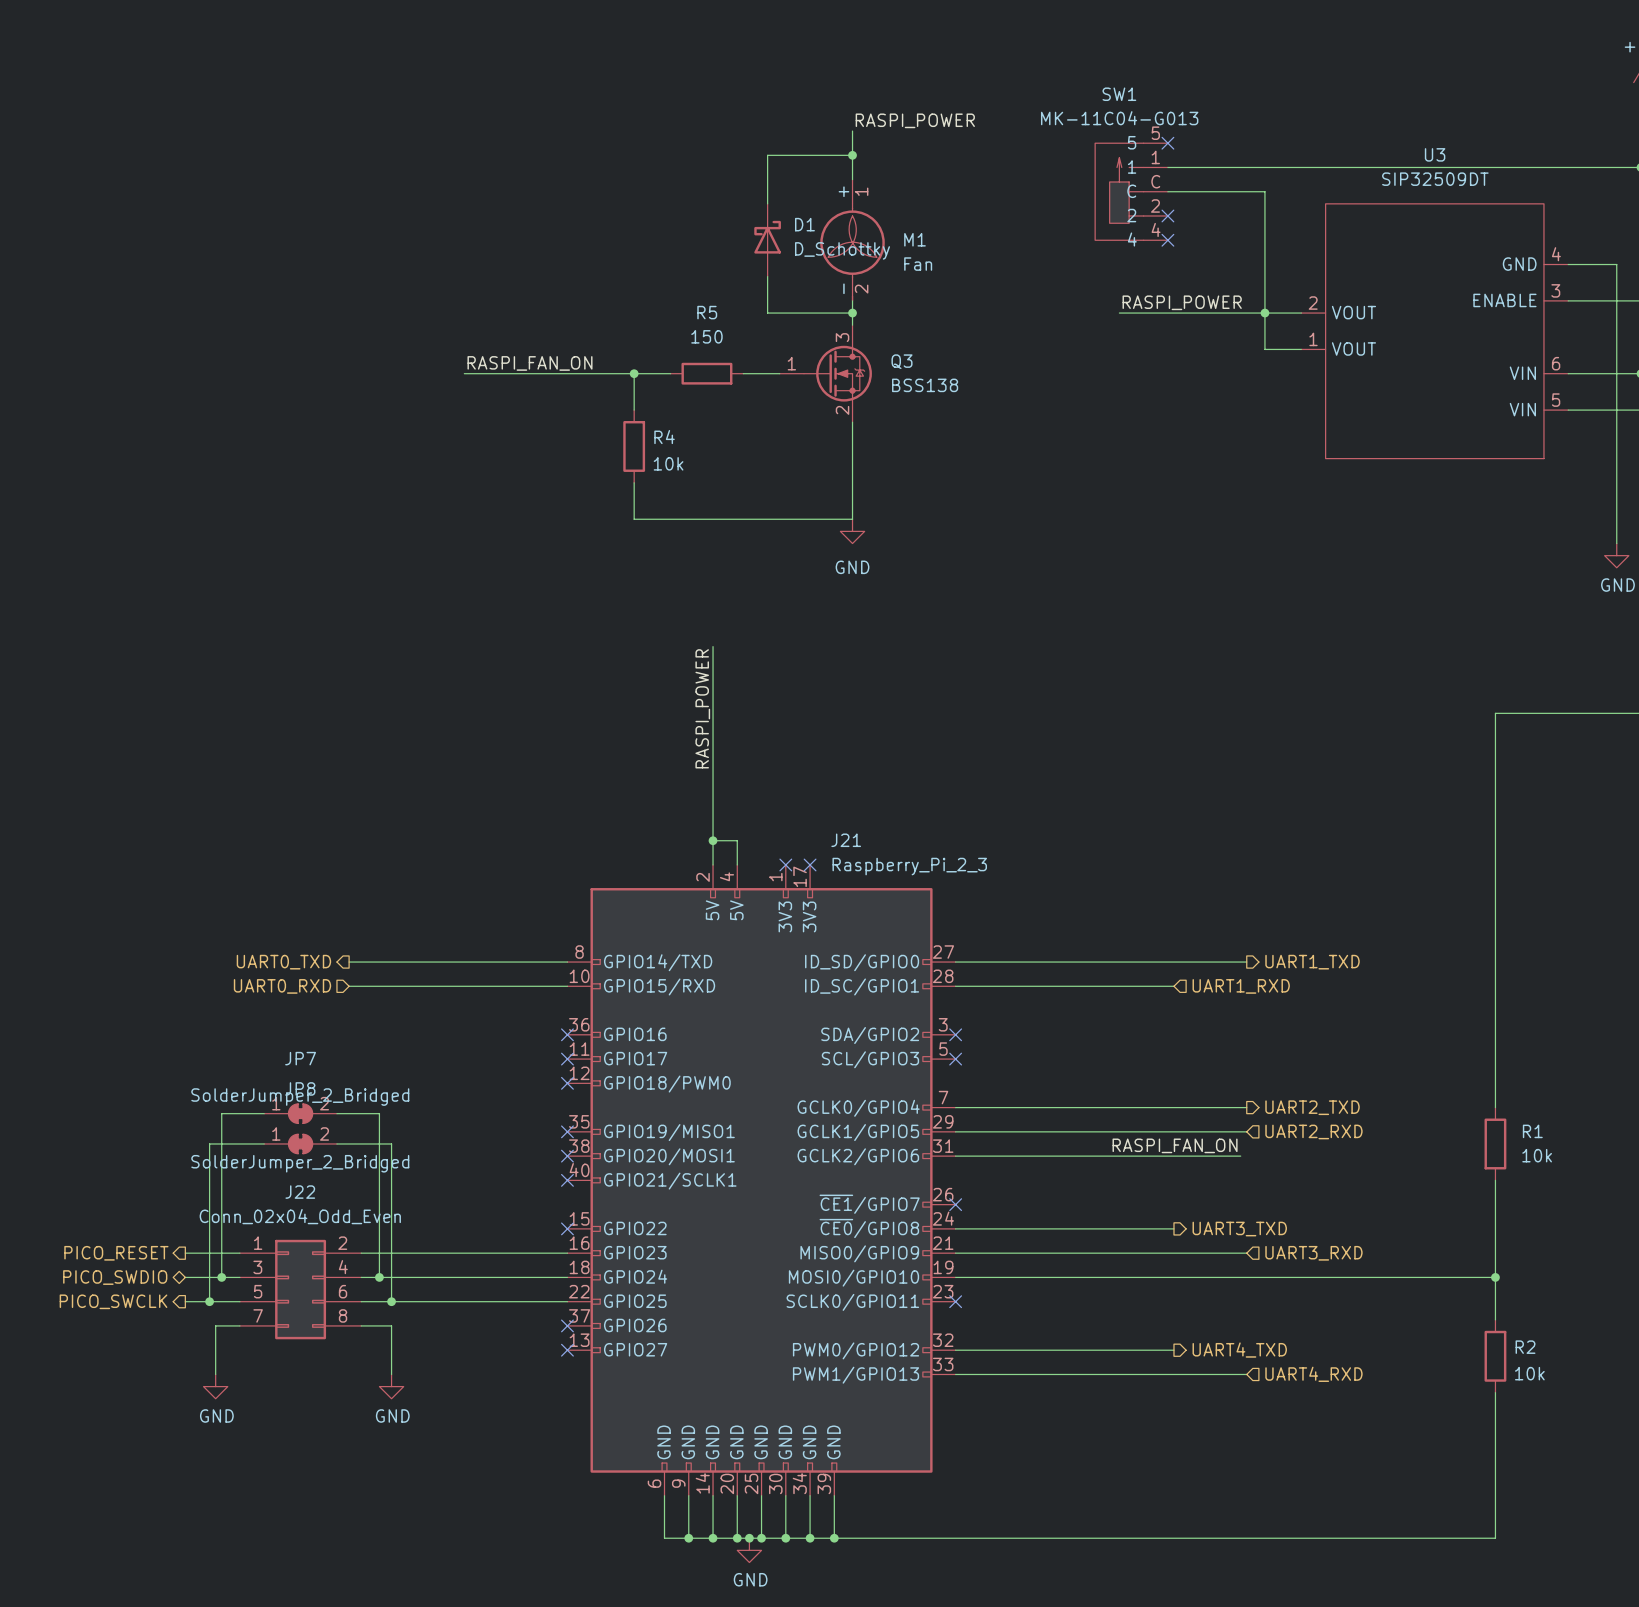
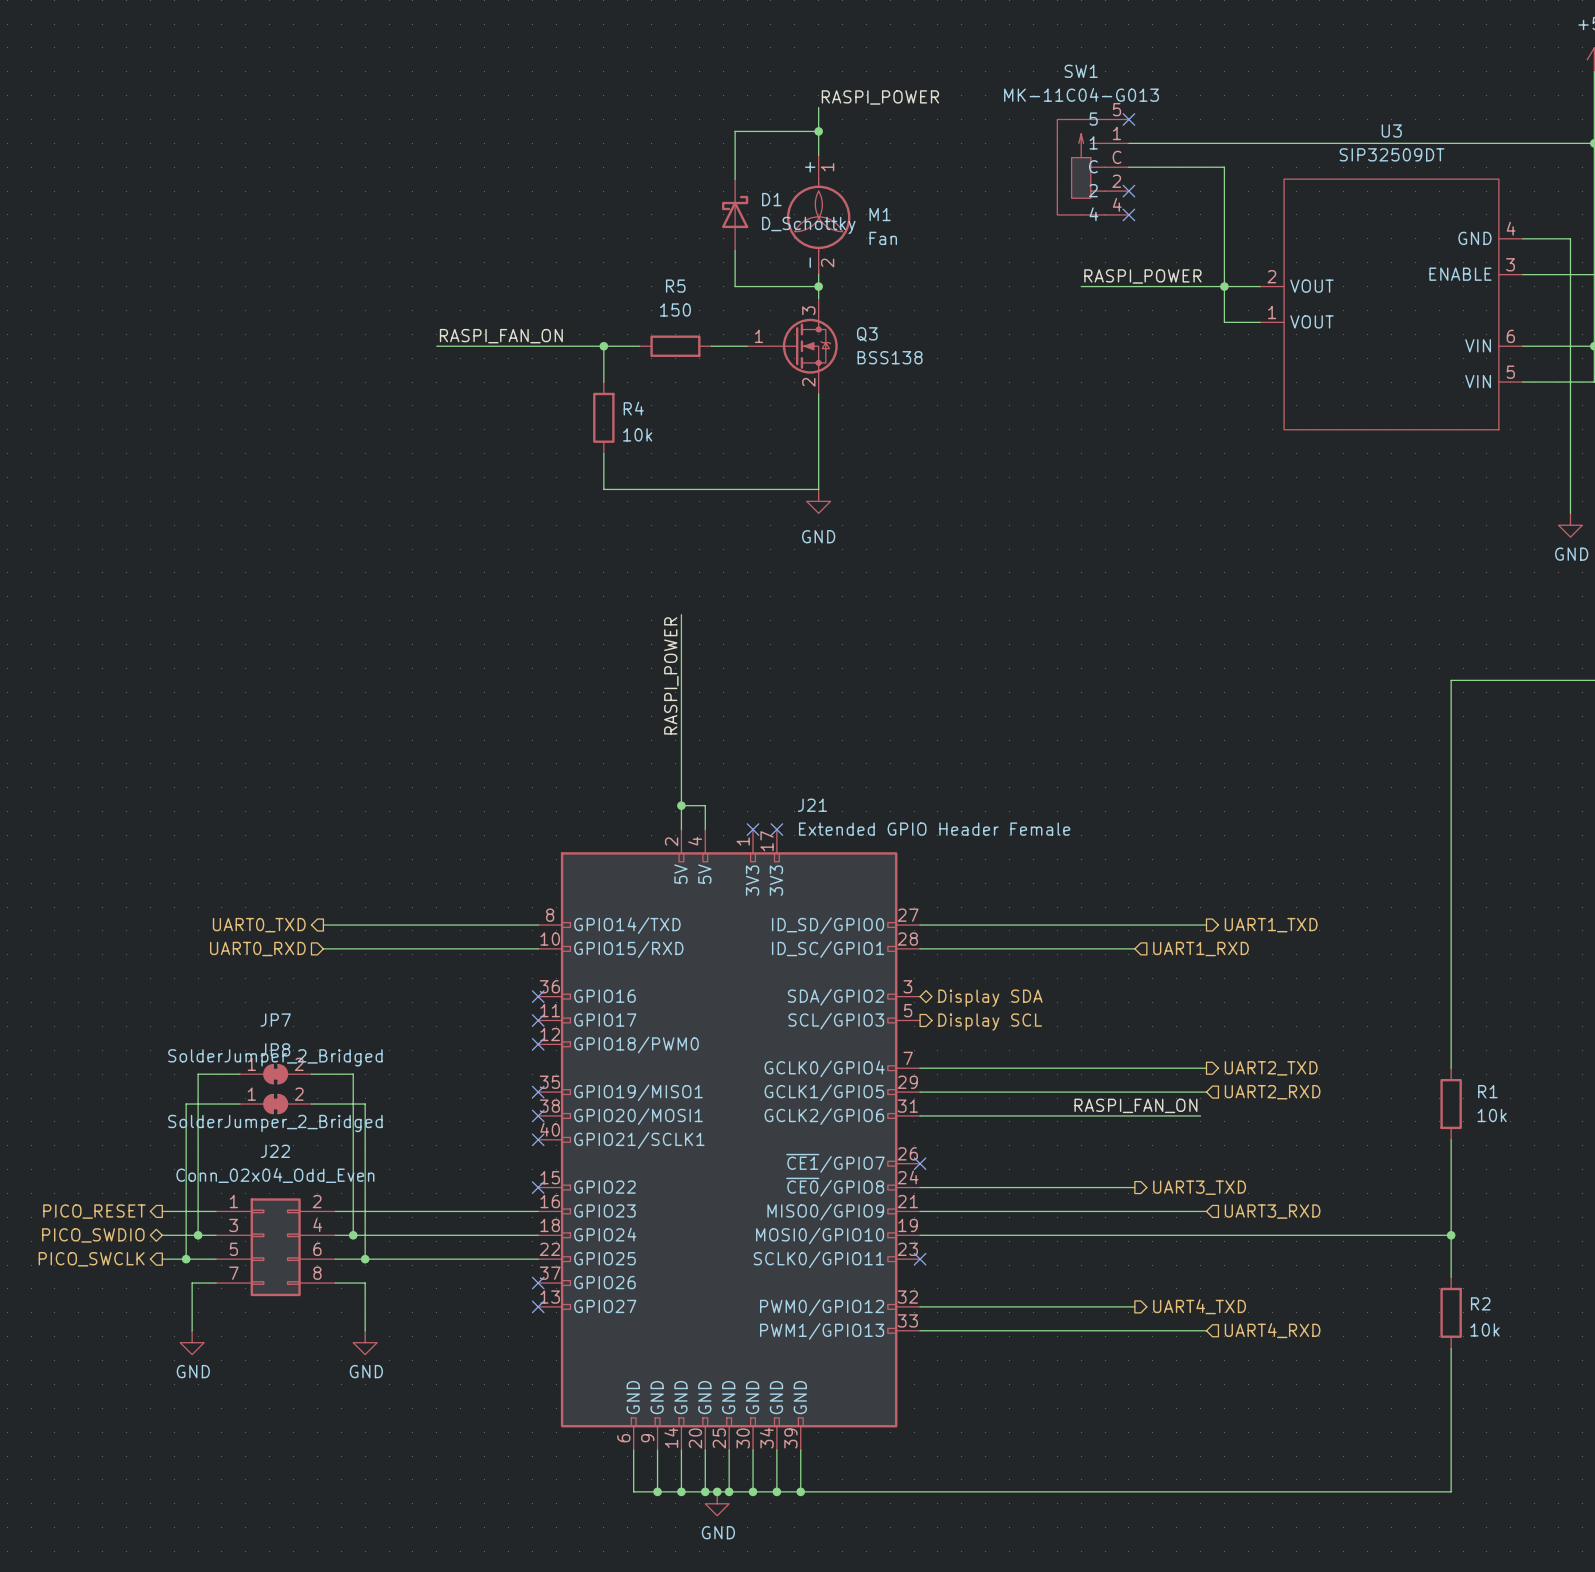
J21 value: Raspberry_Pi_2_3 (909, 866) -> Extended GPIO Header Female (934, 829)
no-connect mark: (955, 1034) -> none
hierarchical label: none -> Display SDA (990, 998)
no-connect mark: (955, 1059) -> none
hierarchical label: none -> Display SCL (990, 1022)

